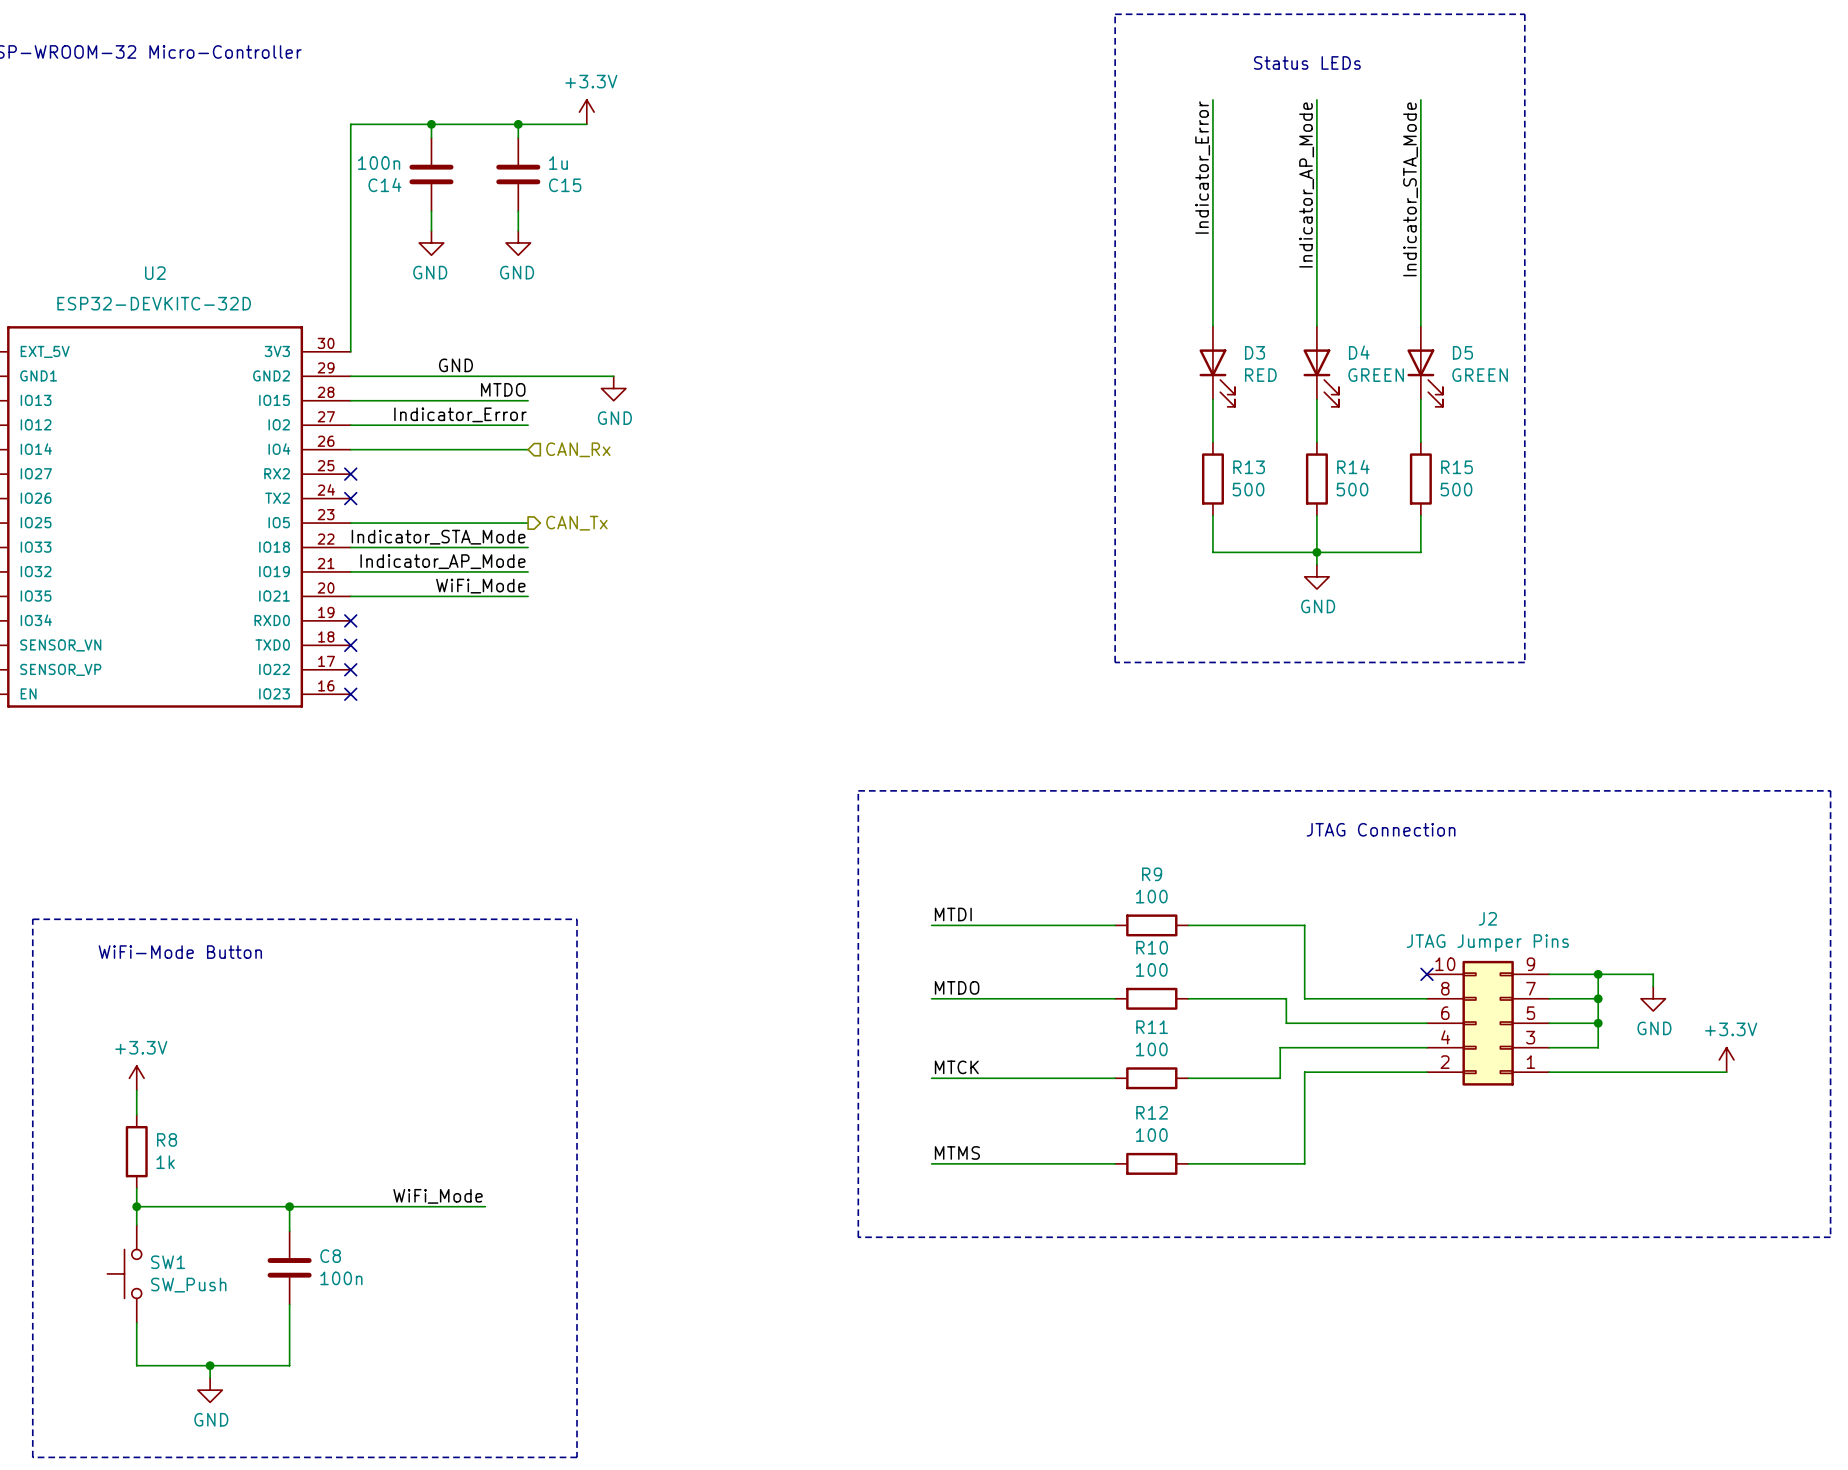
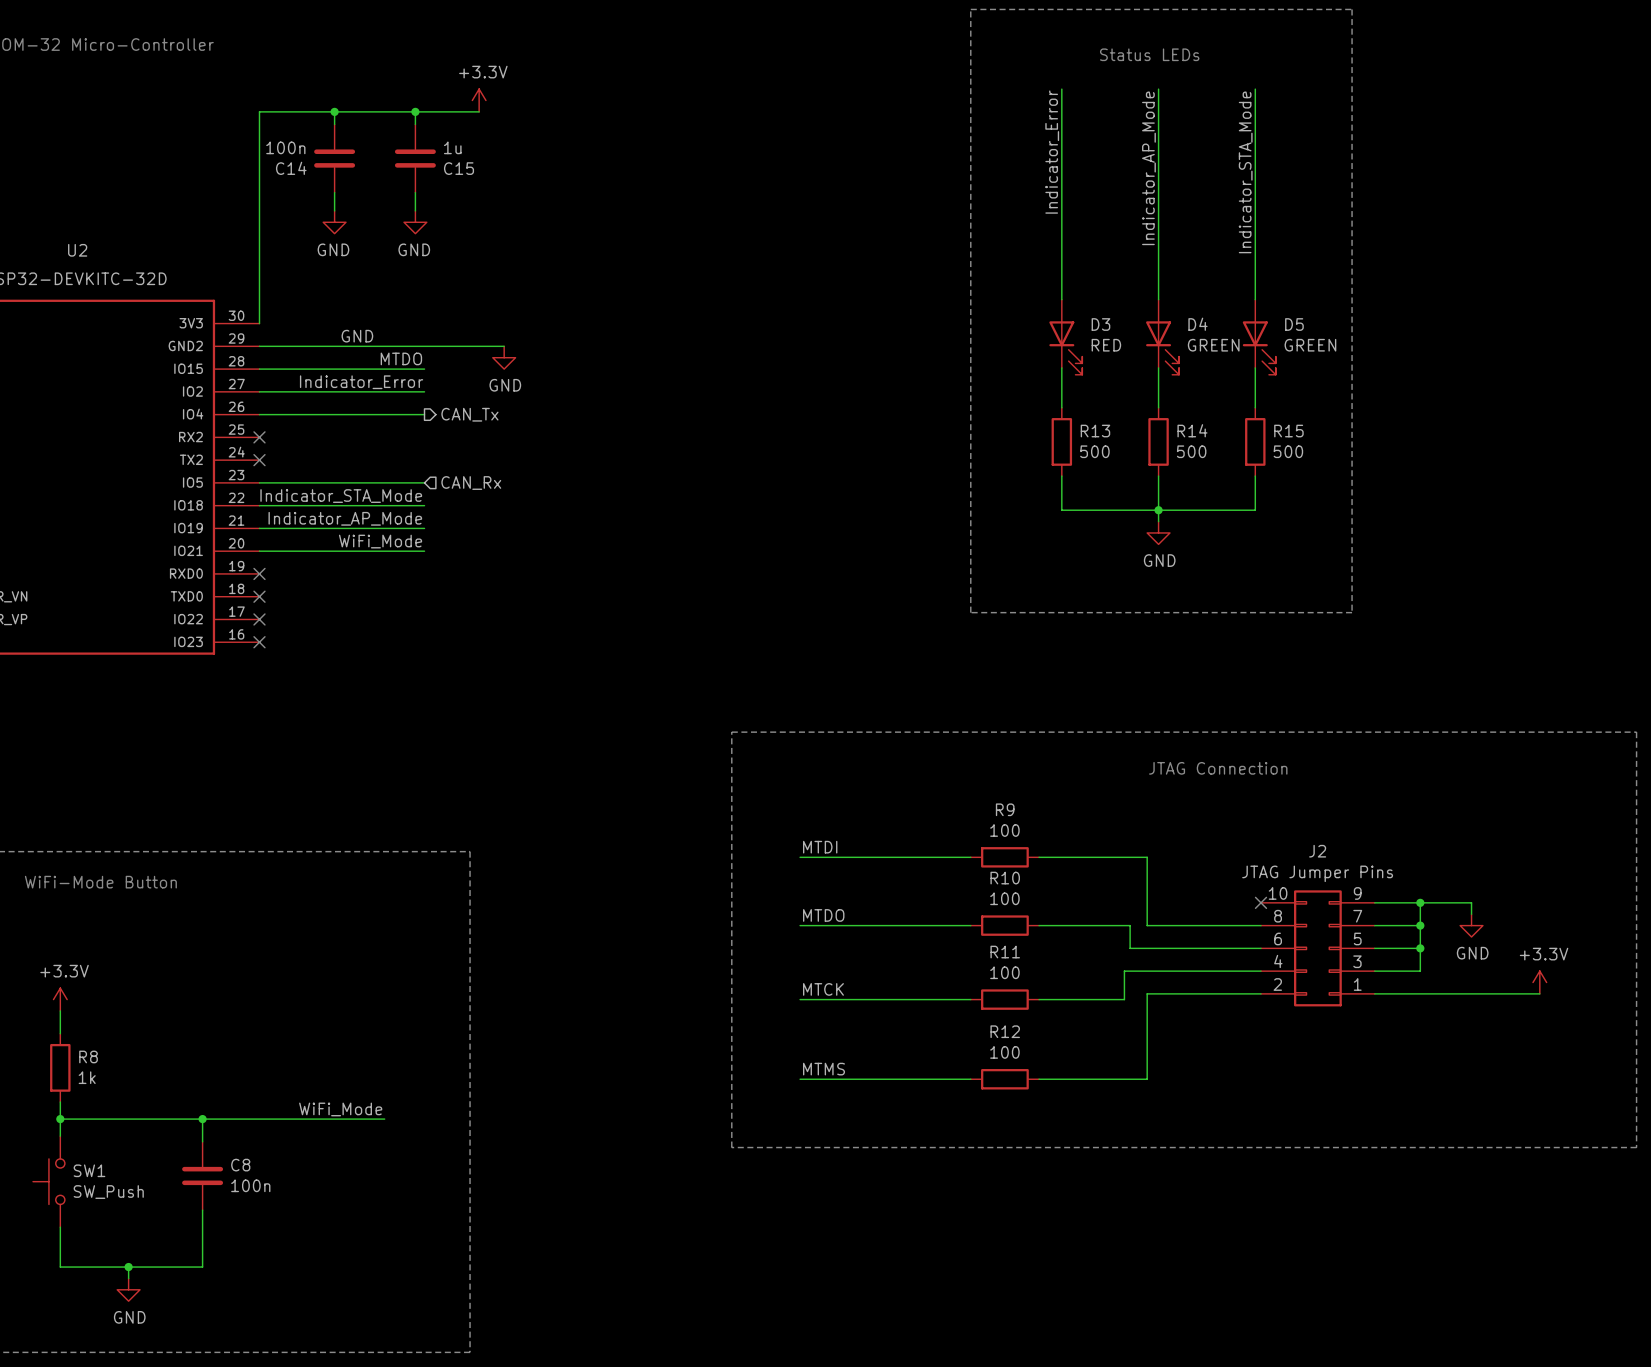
hierarchical label shape: input (578, 449) -> output (469, 414)
hierarchical label: CAN_Rx (578, 449) -> CAN_Tx (469, 414)
hierarchical label shape: output (576, 523) -> input (471, 483)
hierarchical label: CAN_Tx (576, 523) -> CAN_Rx (471, 483)

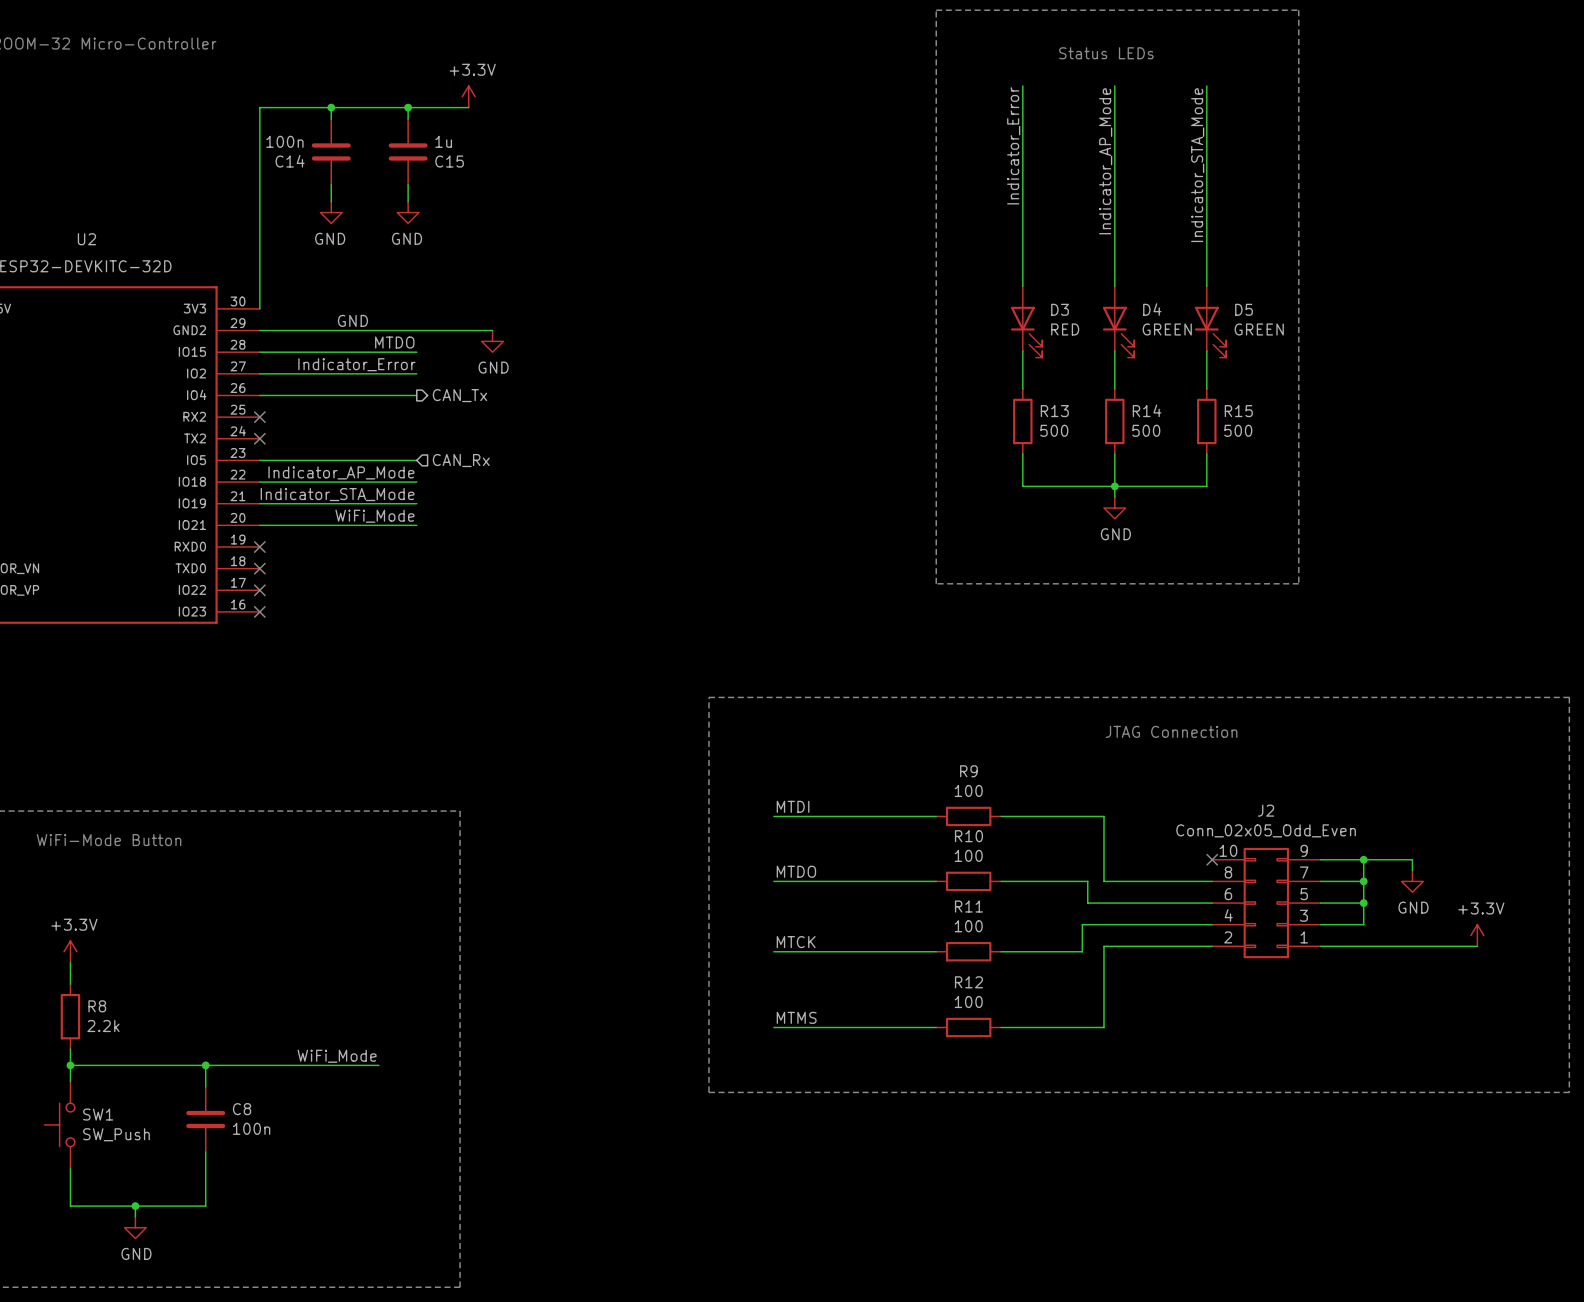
label: Indicator_STA_Mode (341, 496) -> Indicator_AP_Mode (341, 472)
label: Indicator_AP_Mode (345, 518) -> Indicator_STA_Mode (337, 494)
J2 value: JTAG Jumper Pins (1317, 873) -> Conn_02x05_Odd_Even (1266, 830)
R8 value: 1k (87, 1077) -> 2.2k (103, 1026)

